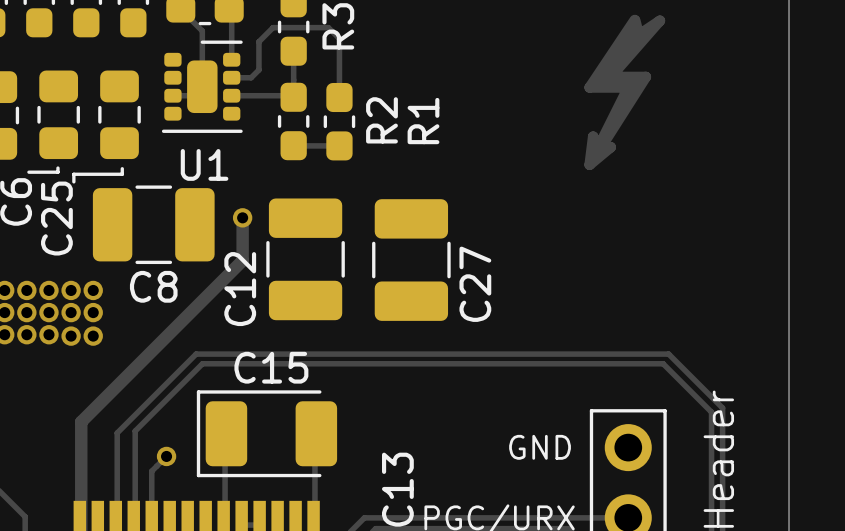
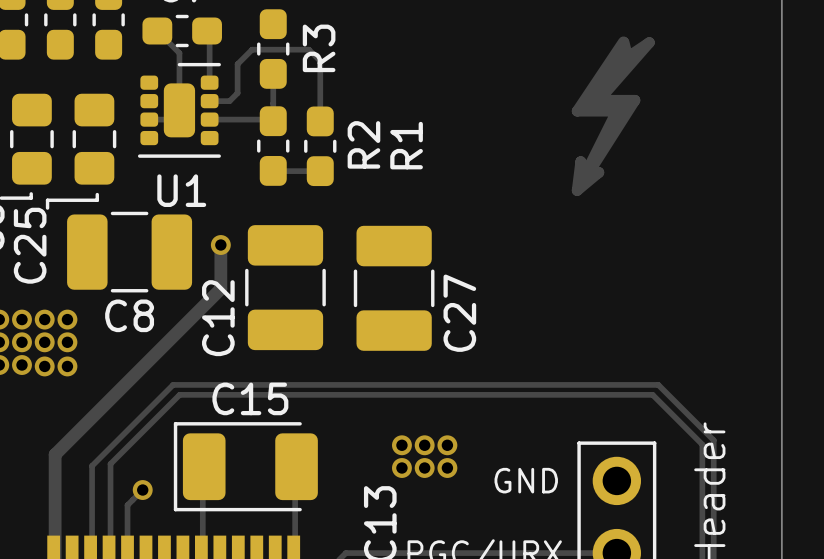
via: none -> (401, 445)
via: none -> (424, 445)
via: none -> (447, 445)
via: none -> (401, 468)
via: none -> (424, 468)
via: none -> (447, 468)

